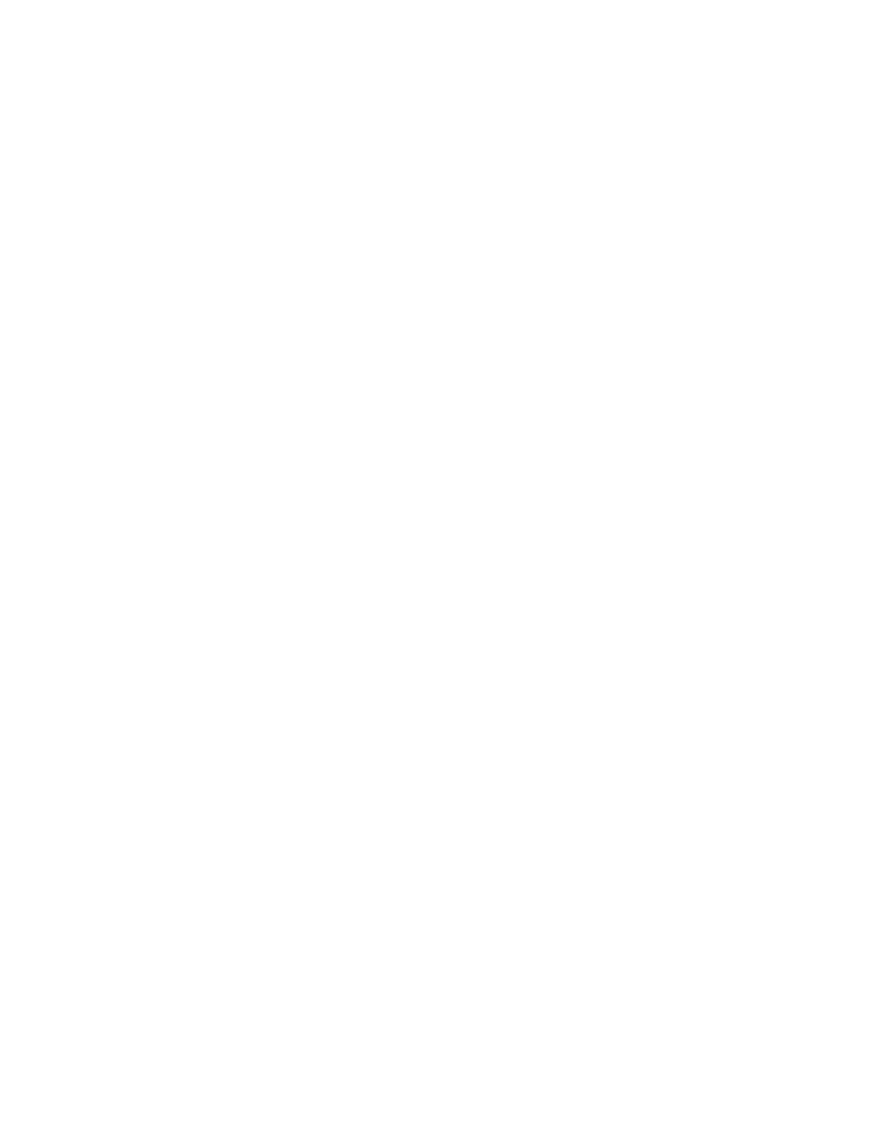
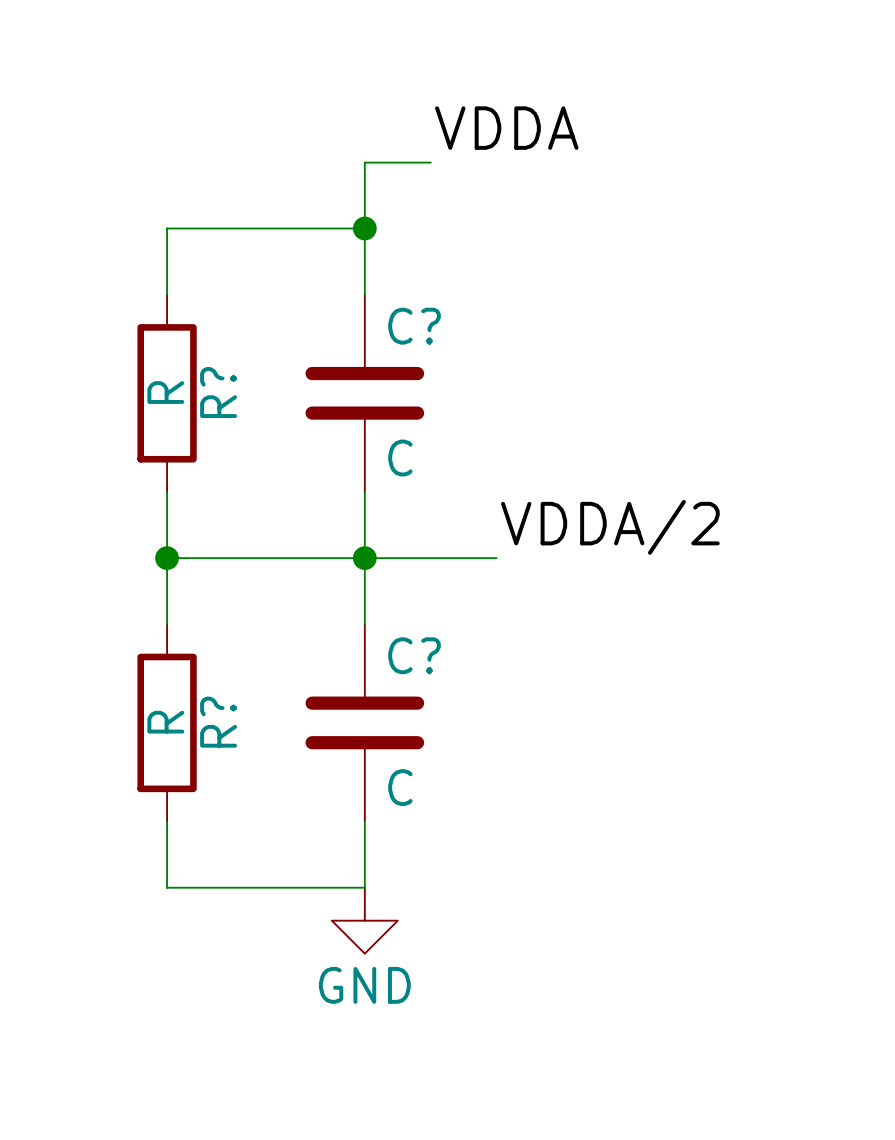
label: none -> VDDA (506, 128)
wire: none -> (430, 162) (364, 162) (364, 294)
wire: none -> (364, 228) (167, 228) (167, 294)
junction: none -> (364, 228)
R?: none -> R (167, 393)
C?: none -> C (364, 393)
wire: none -> (167, 492) (167, 624)
wire: none -> (364, 492) (364, 624)
label: none -> VDDA/2 (610, 527)
wire: none -> (167, 558) (496, 558)
junction: none -> (167, 558)
junction: none -> (364, 558)
R?: none -> R (167, 722)
C?: none -> C (364, 722)
wire: none -> (167, 821) (167, 887) (364, 887) (364, 821)
power symbol: none -> GND (364, 920)

